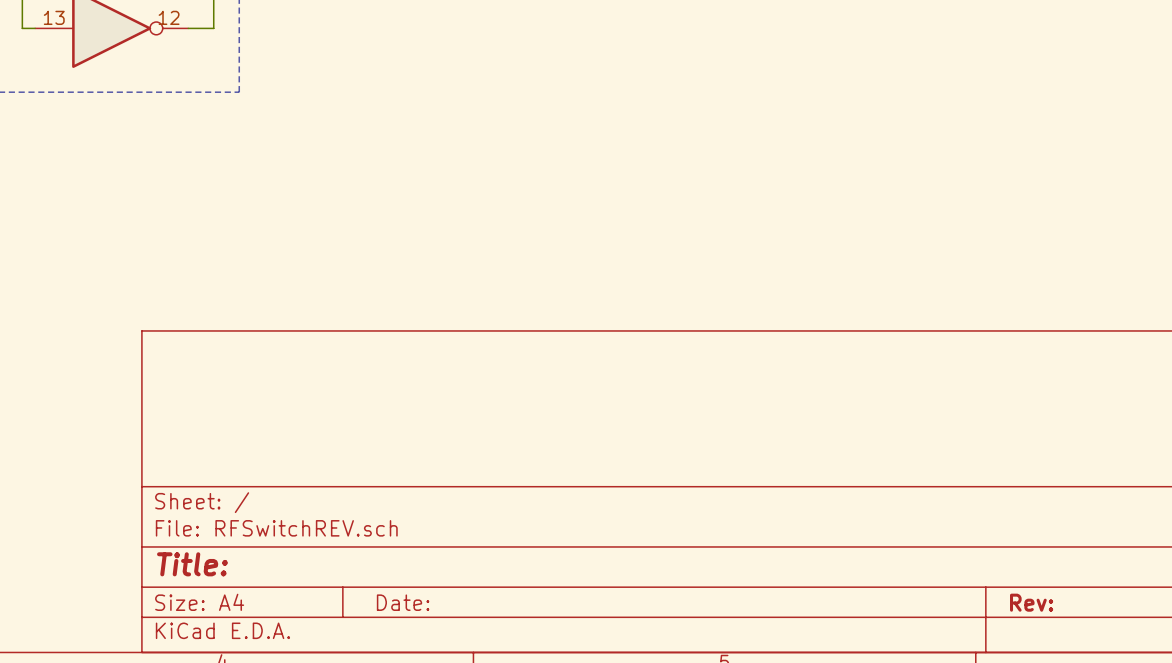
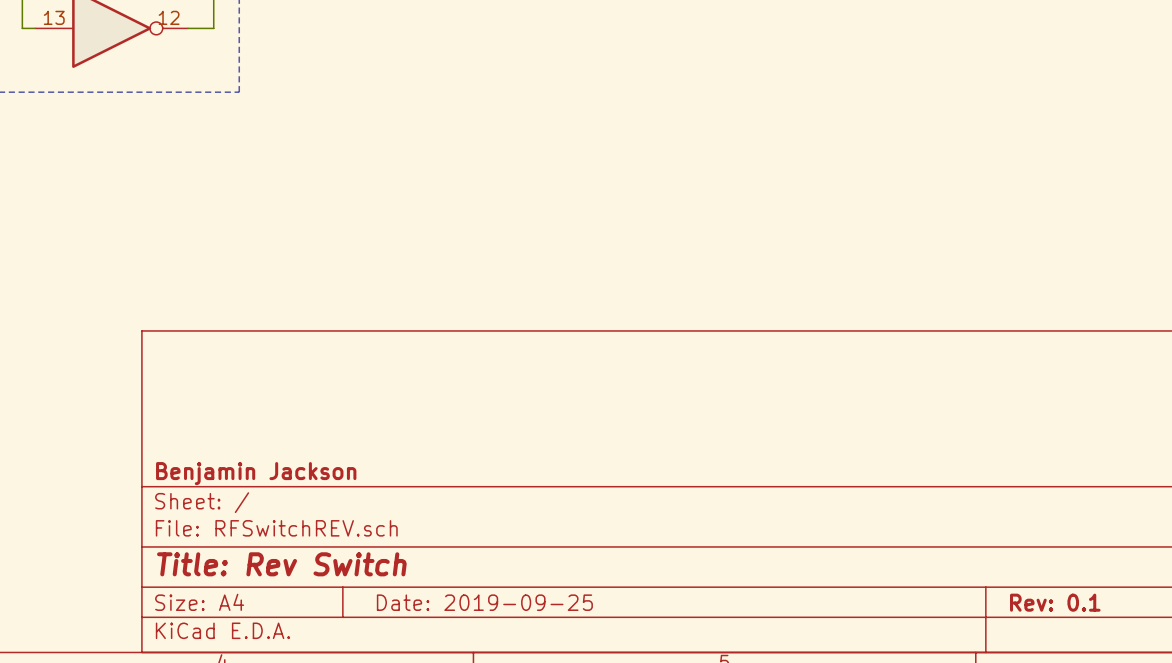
title block: none -> Benjamin Jackson (256, 473)
title block: Title: (192, 564) -> Title: Rev Switch (281, 564)
title block: Date: (403, 602) -> Date: 2019-09-25 (484, 602)
title block: Rev: (1031, 602) -> Rev: 0.1 (1055, 602)

